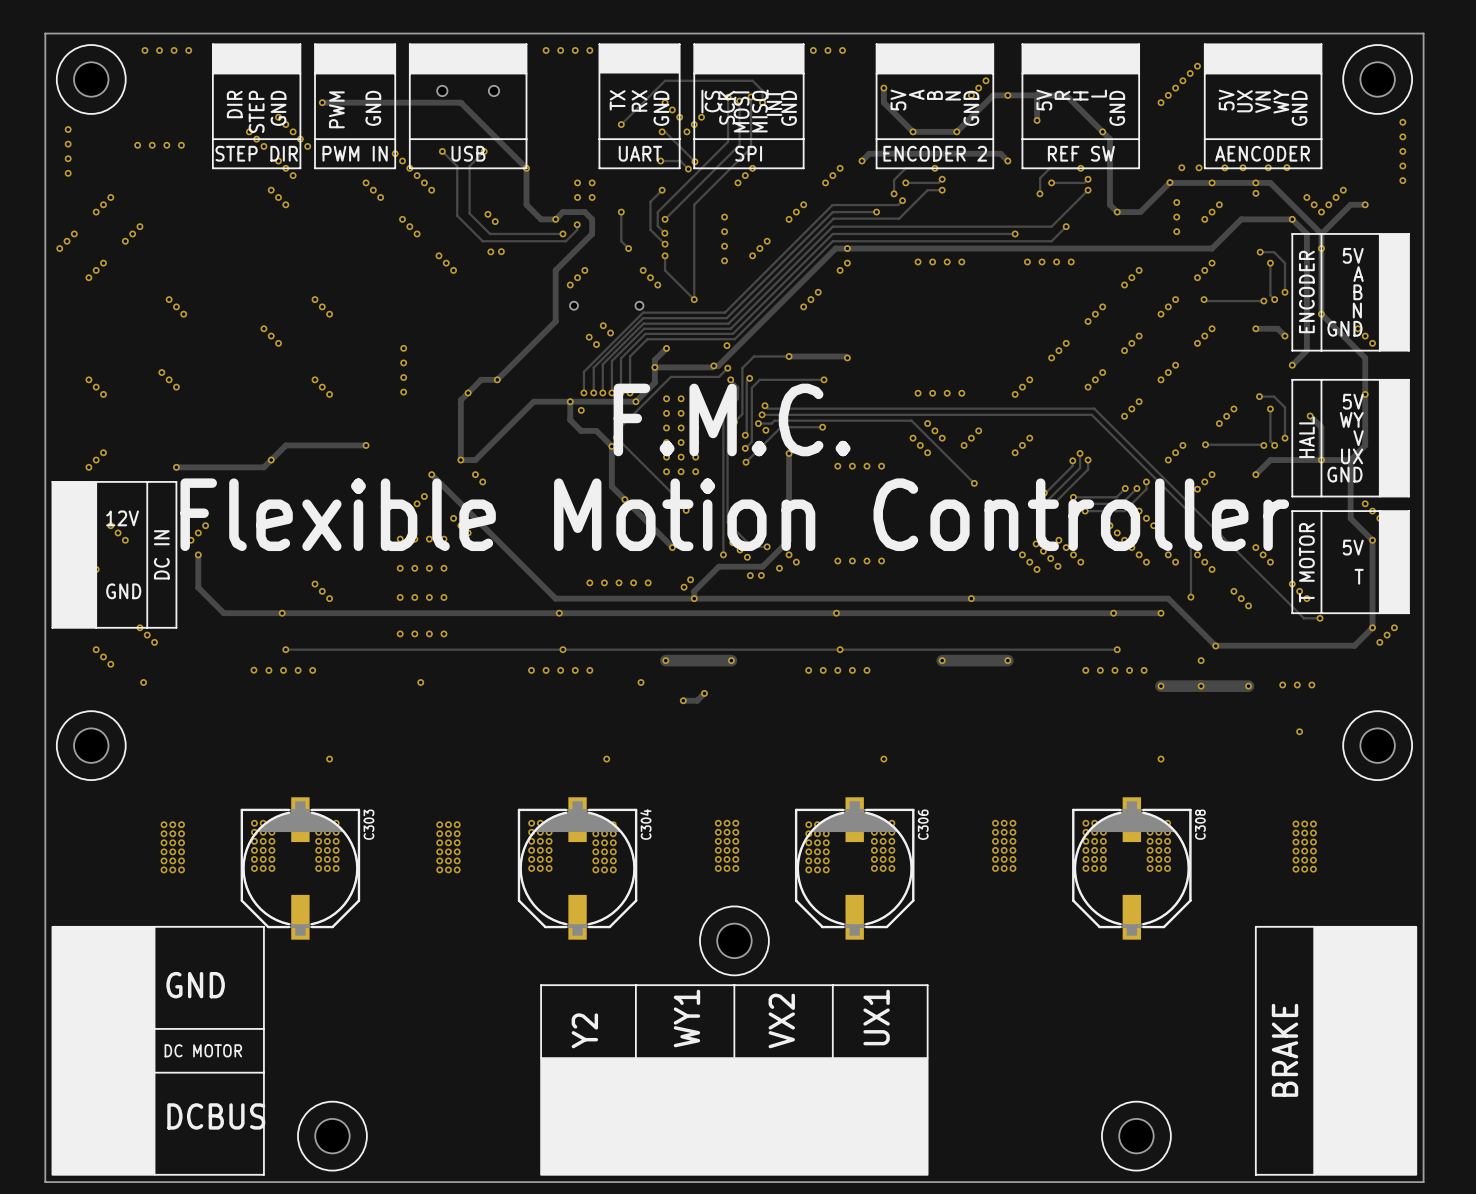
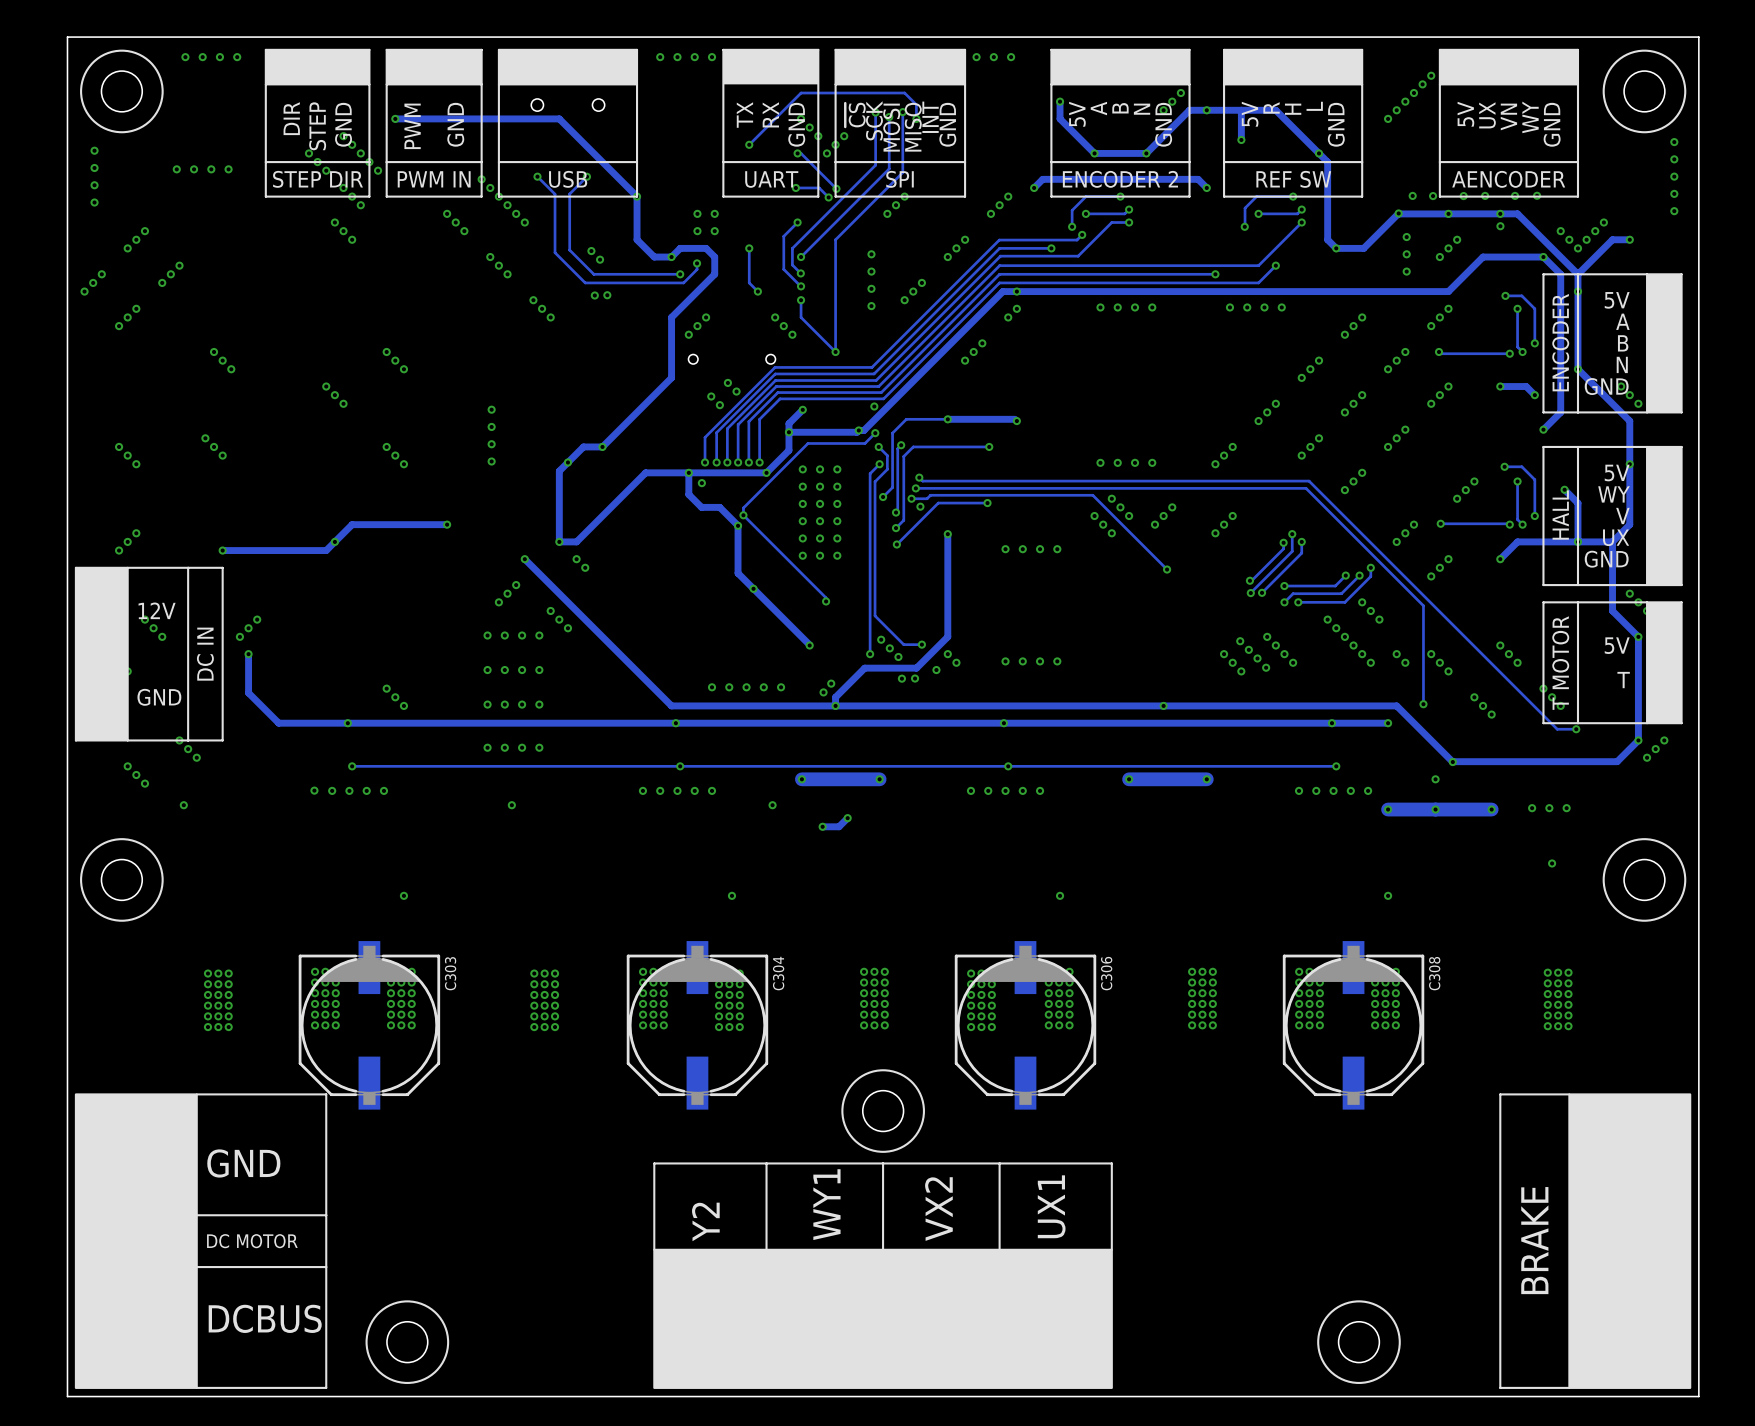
text: F.M.C. (732, 419) -> none
text: Flexible Motion Controller (734, 514) -> none

